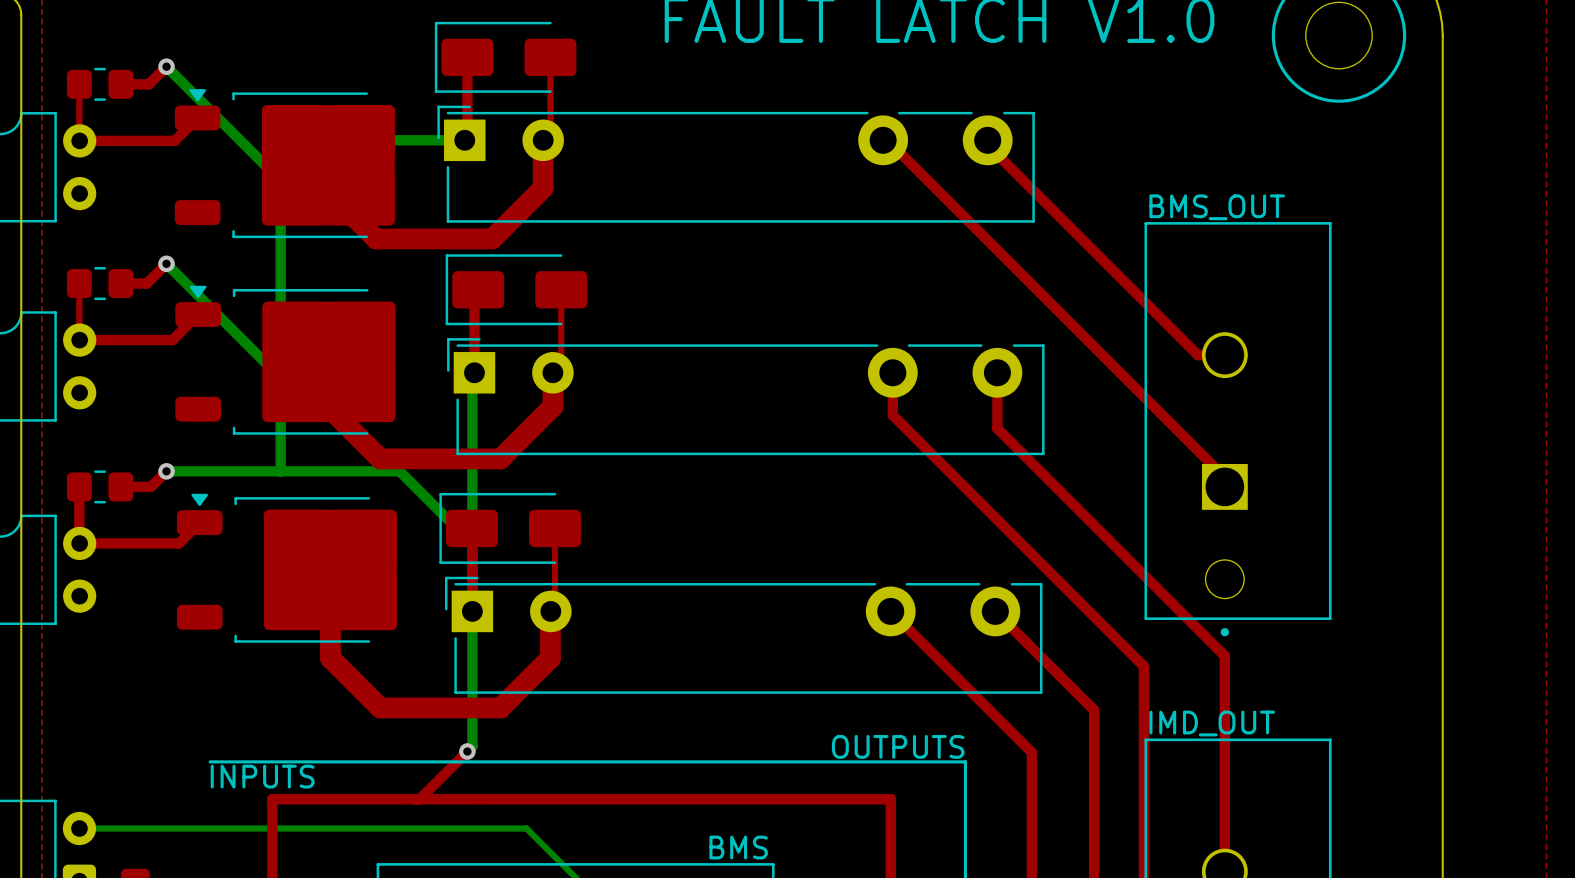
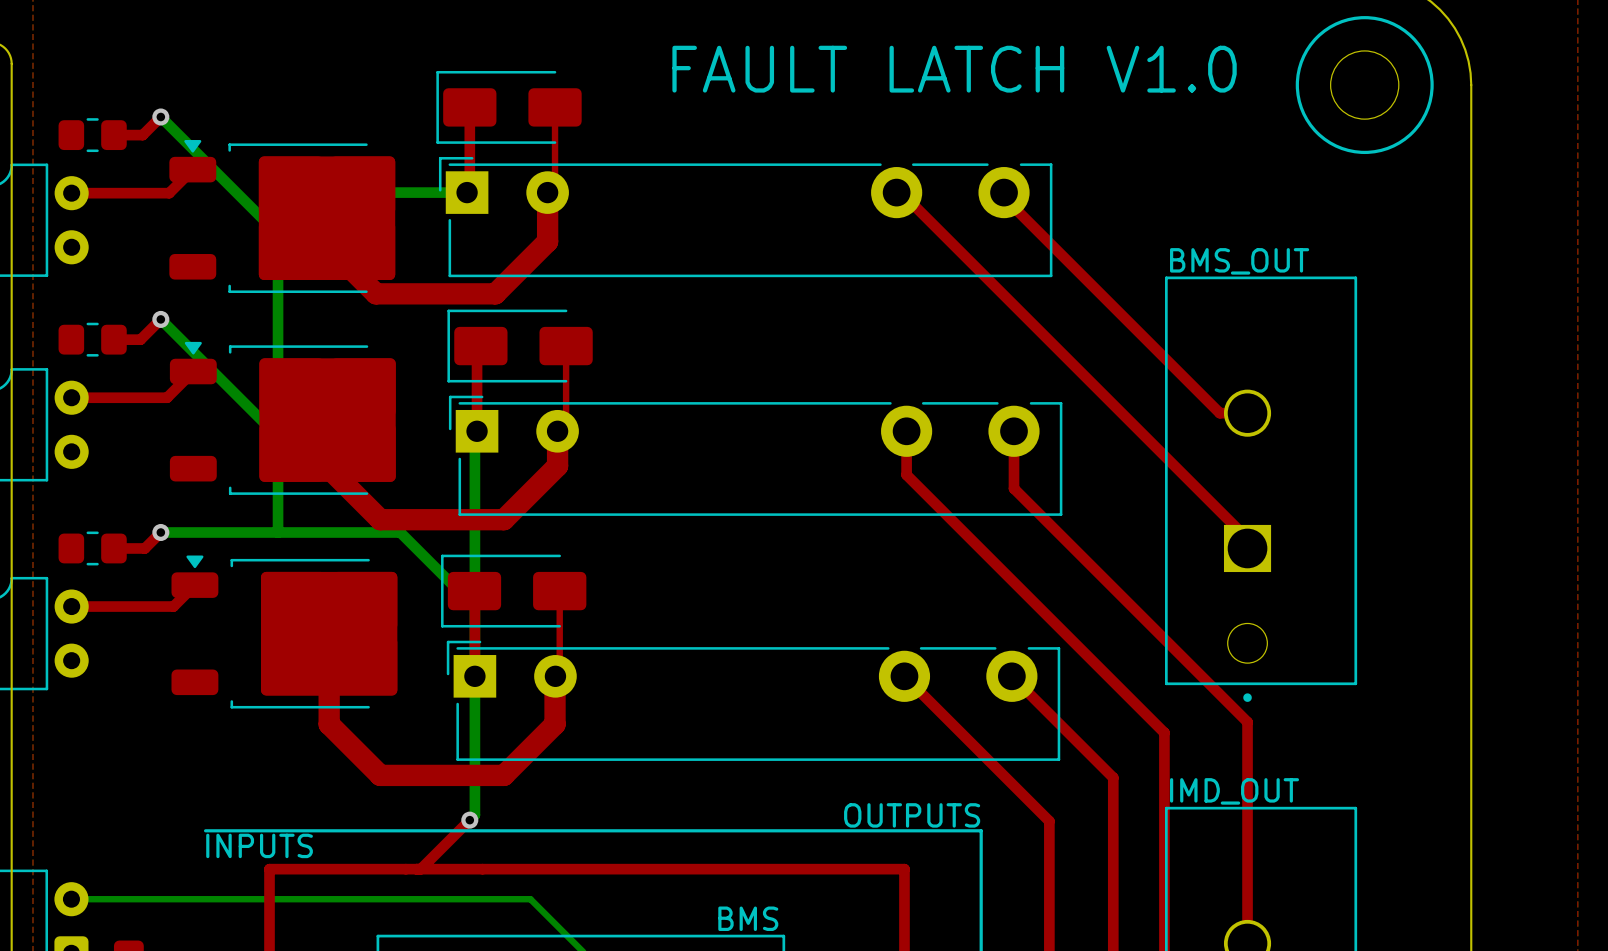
top track: (79, 84) (79, 140) -> none
top track: (79, 283) (79, 340) -> none
top track: (79, 486) (79, 543) -> none

